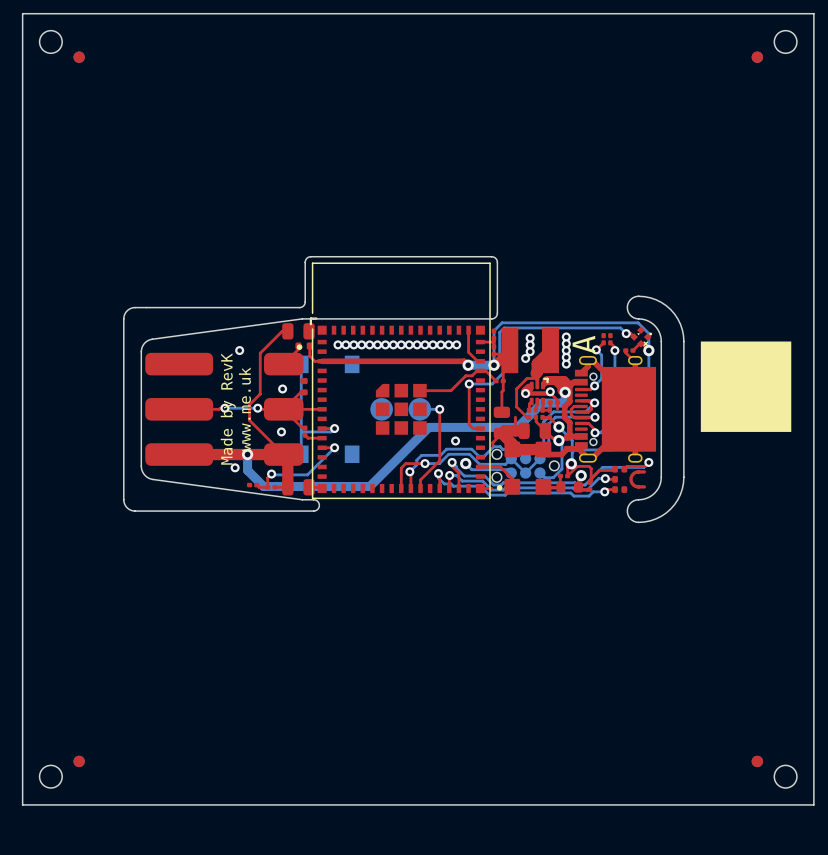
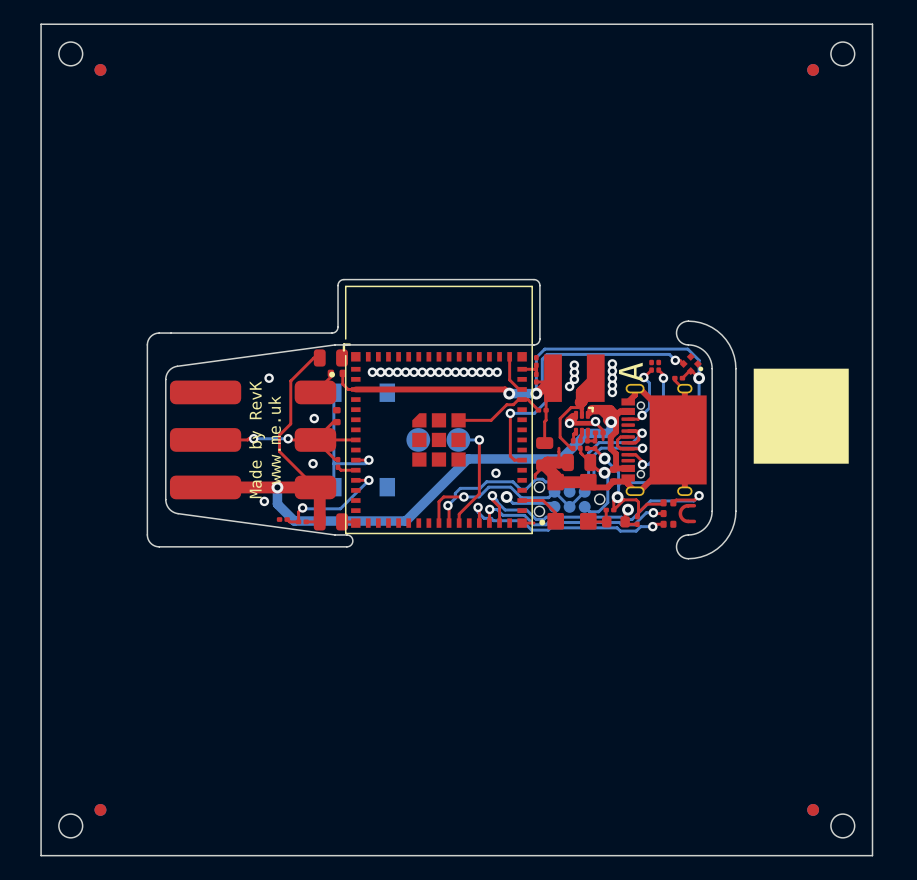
part footprint: [630, 326, 653, 348] -> [679, 353, 704, 375]

